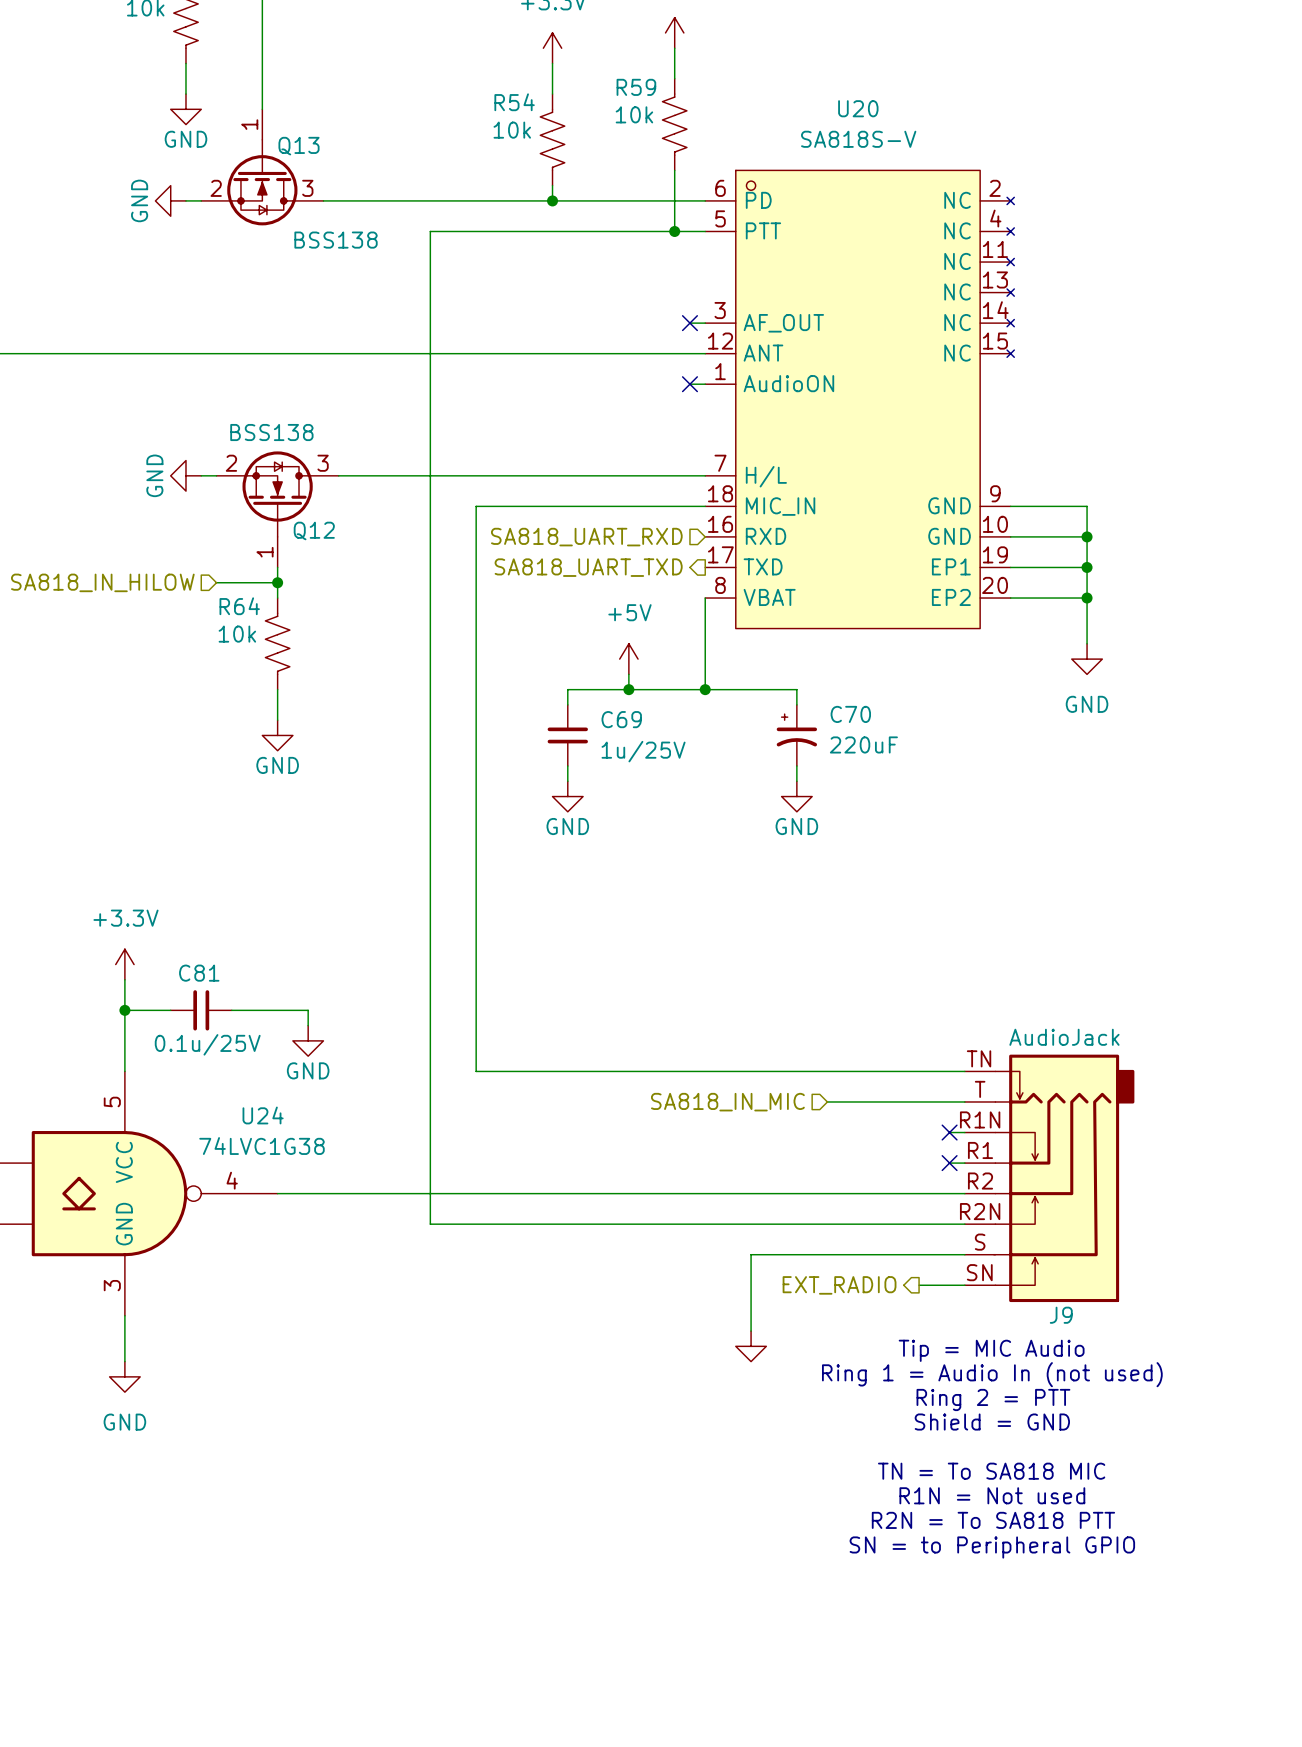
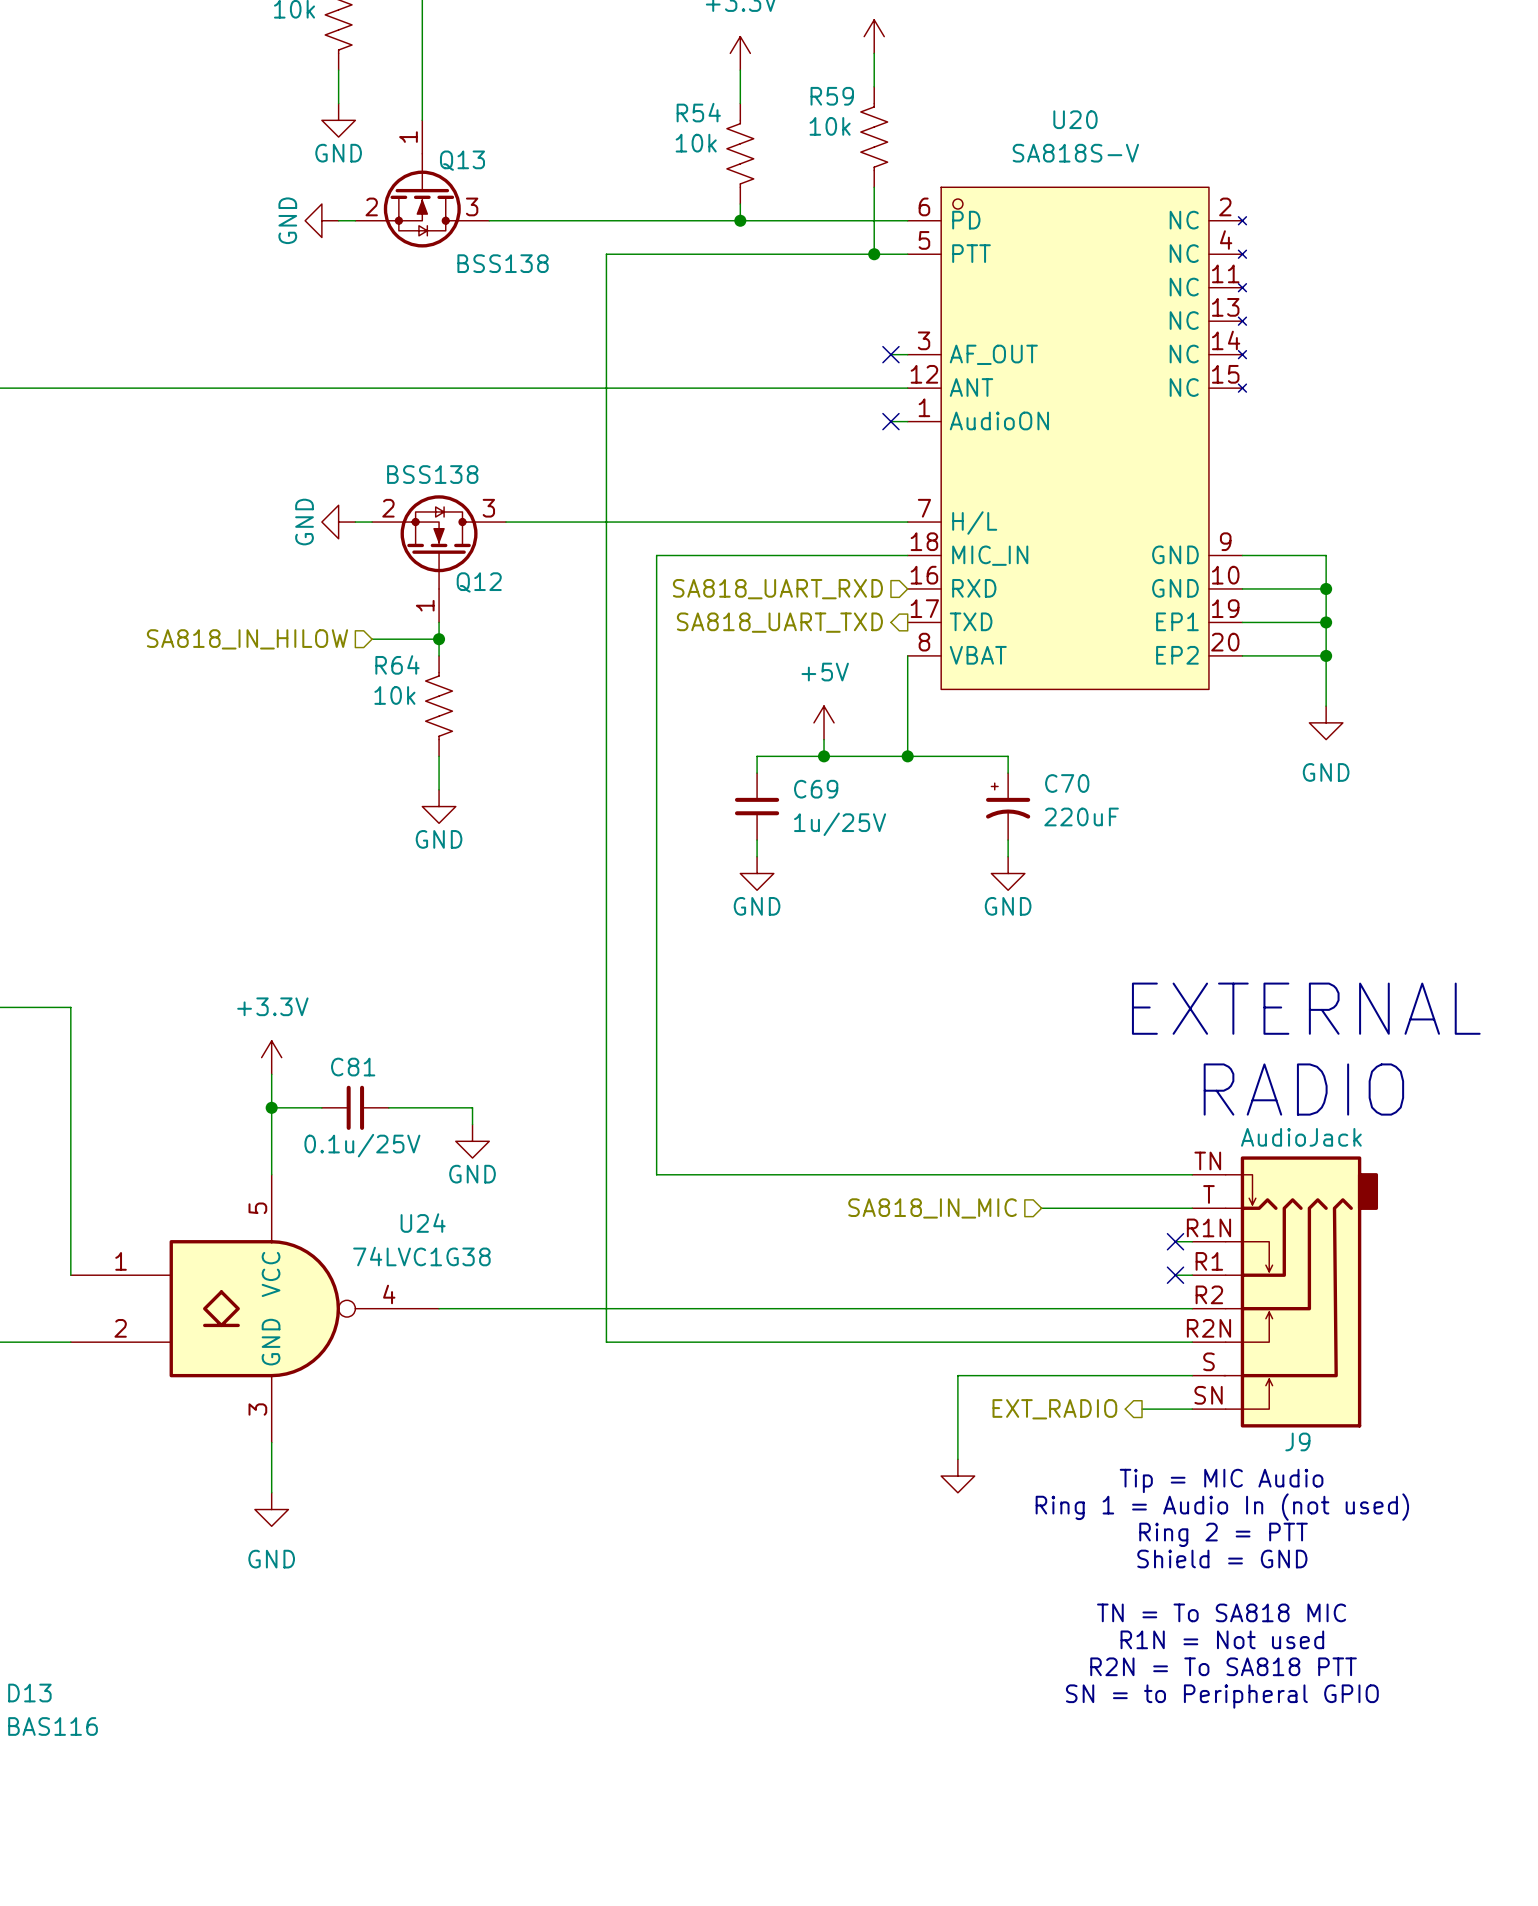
text: none -> EXTERNAL (1306, 1008)
text: none -> RADIO (1303, 1089)

